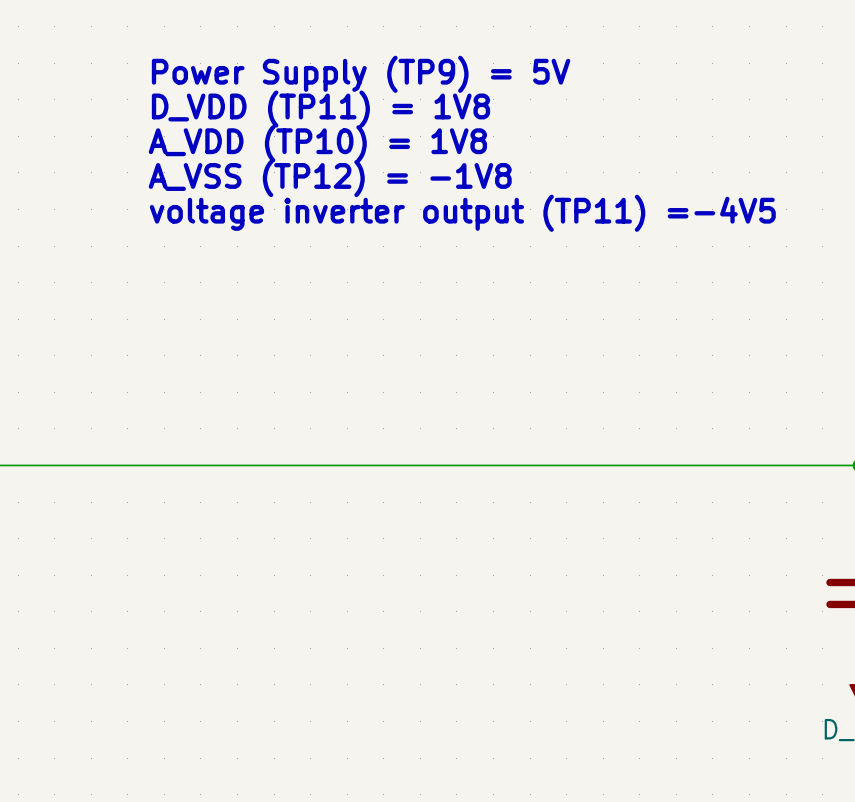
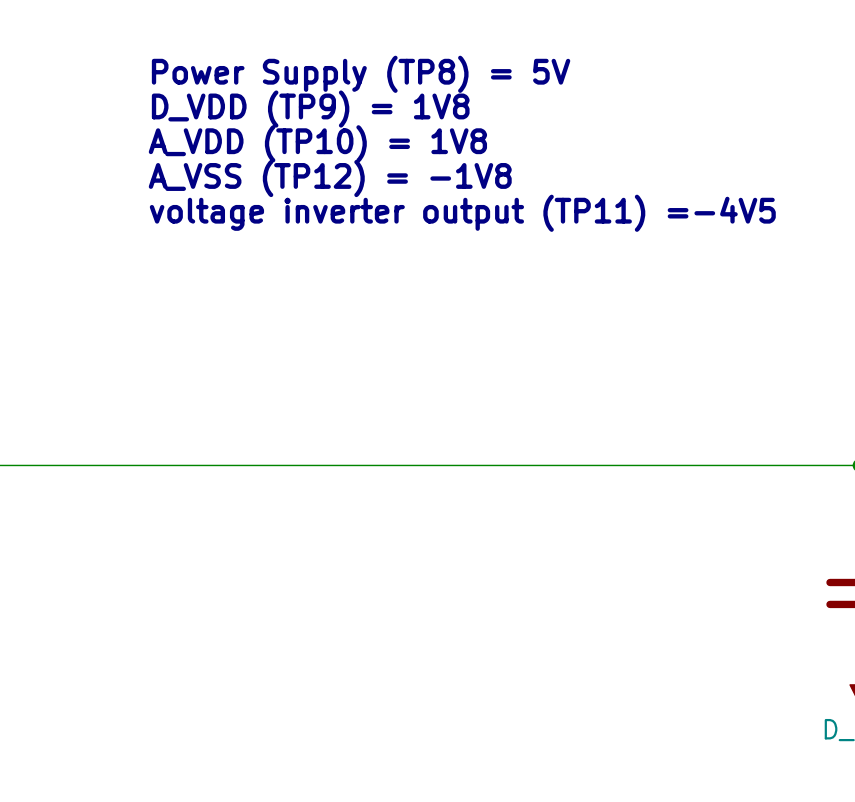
text: Power Supply (TP9) = 5V (361, 74) -> Power Supply (TP8) = 5V (361, 74)
text: D_VDD (TP11) = 1V8 (320, 109) -> D_VDD (TP9) = 1V8 (310, 109)

